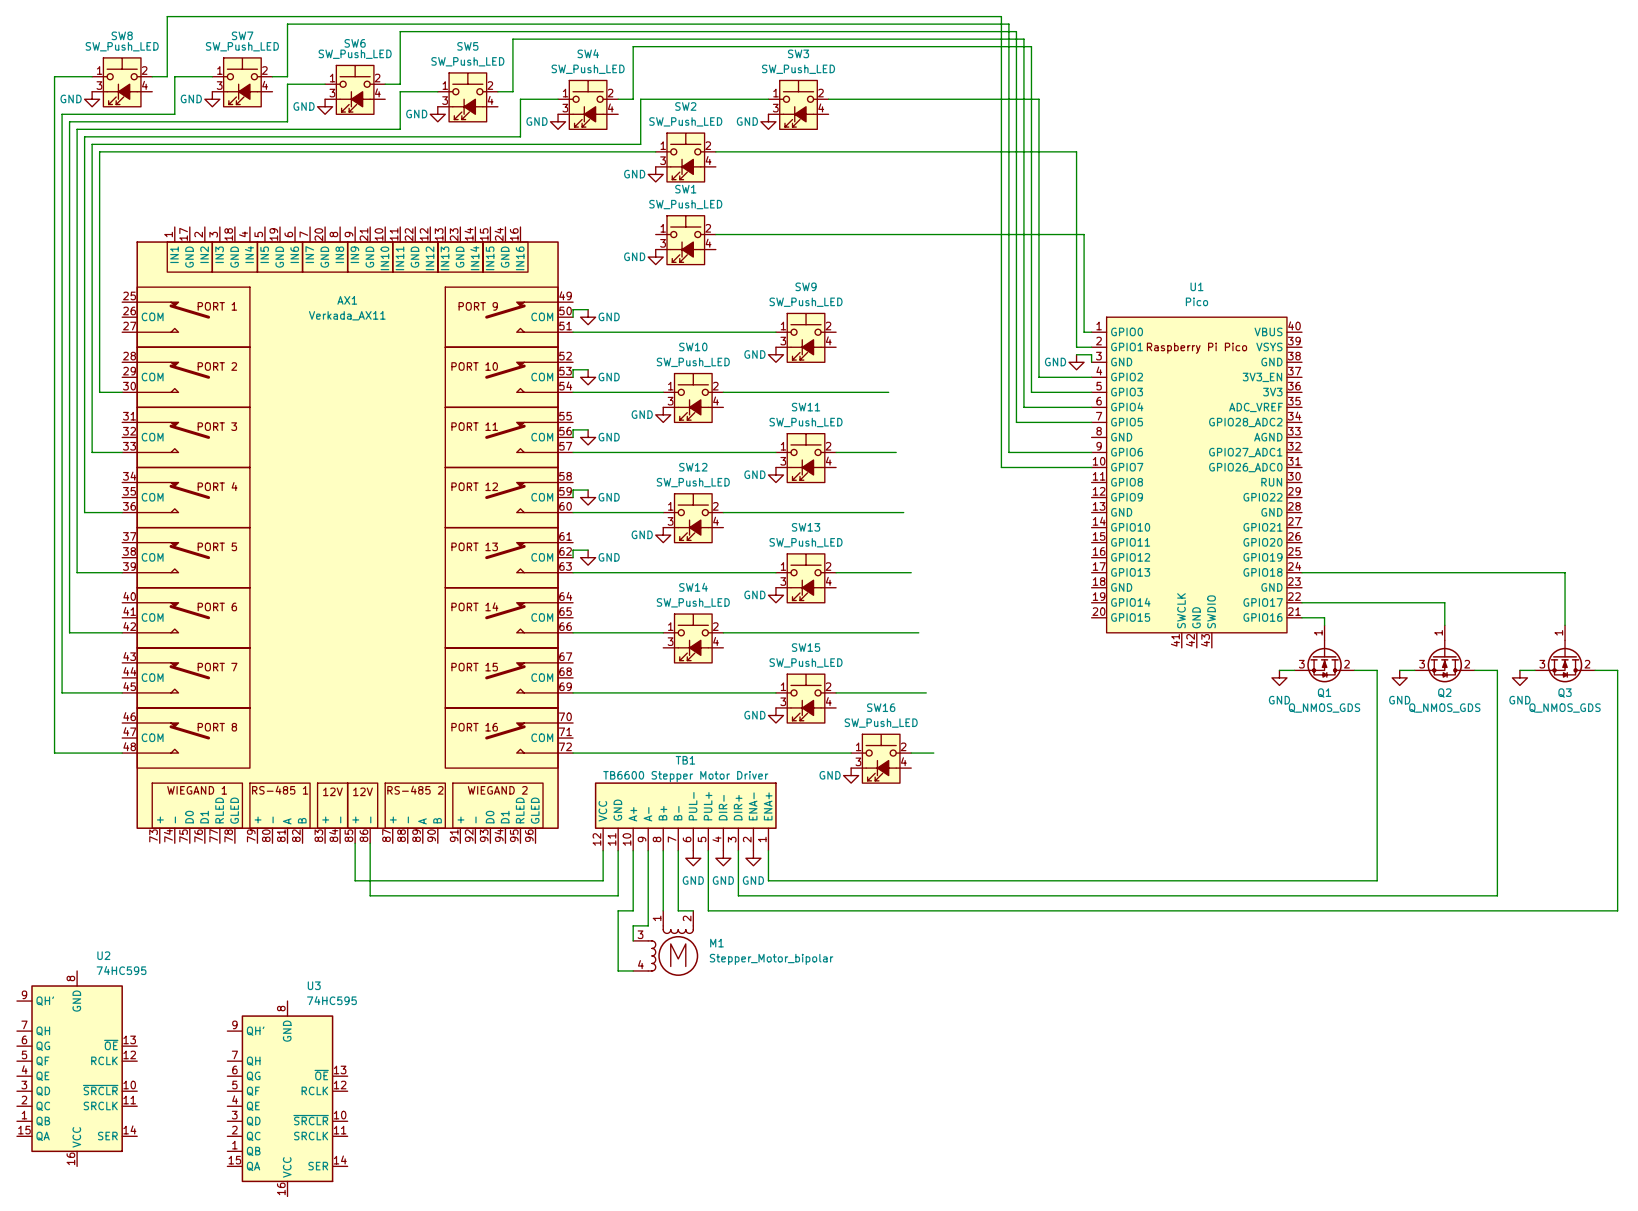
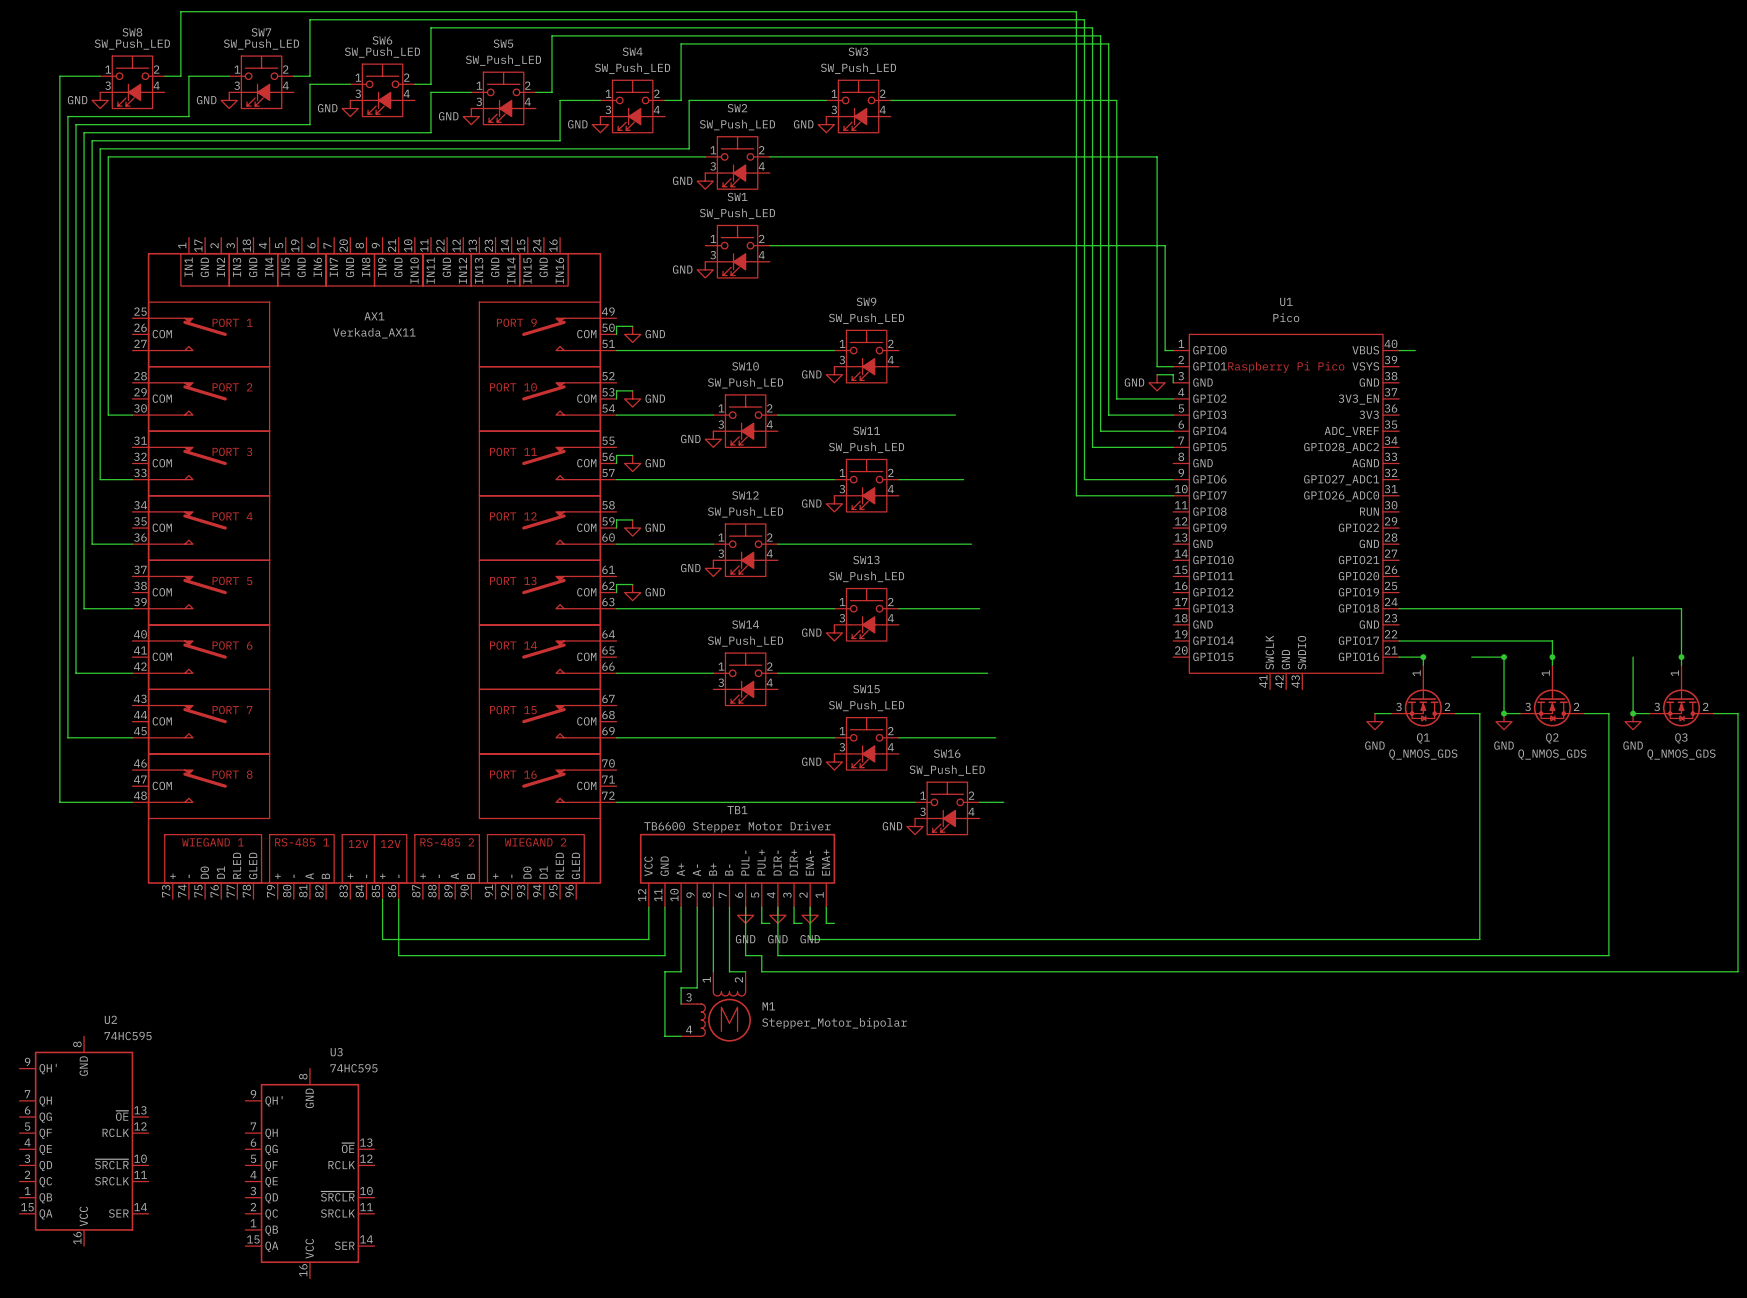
wire: none -> (1399, 350) (1415, 350)
junction: none -> (1423, 657)
wire: none -> (1471, 657) (1504, 657) (1504, 713)
junction: none -> (1504, 657)
junction: none -> (1552, 657)
wire: none -> (1633, 657) (1633, 713)
junction: none -> (1681, 657)
junction: none -> (1504, 713)
junction: none -> (1633, 713)
wire: none -> (810, 907) (810, 939) (826, 939)
wire: (708, 865) (708, 895) -> (745, 907) (745, 955) (761, 955)
wire: none -> (761, 923) (769, 923)
wire: (738, 865) (738, 895) -> (777, 907) (777, 955) (794, 955)
wire: none -> (794, 923) (802, 923)
wire: (768, 865) (768, 880) -> (826, 923) (834, 923)

